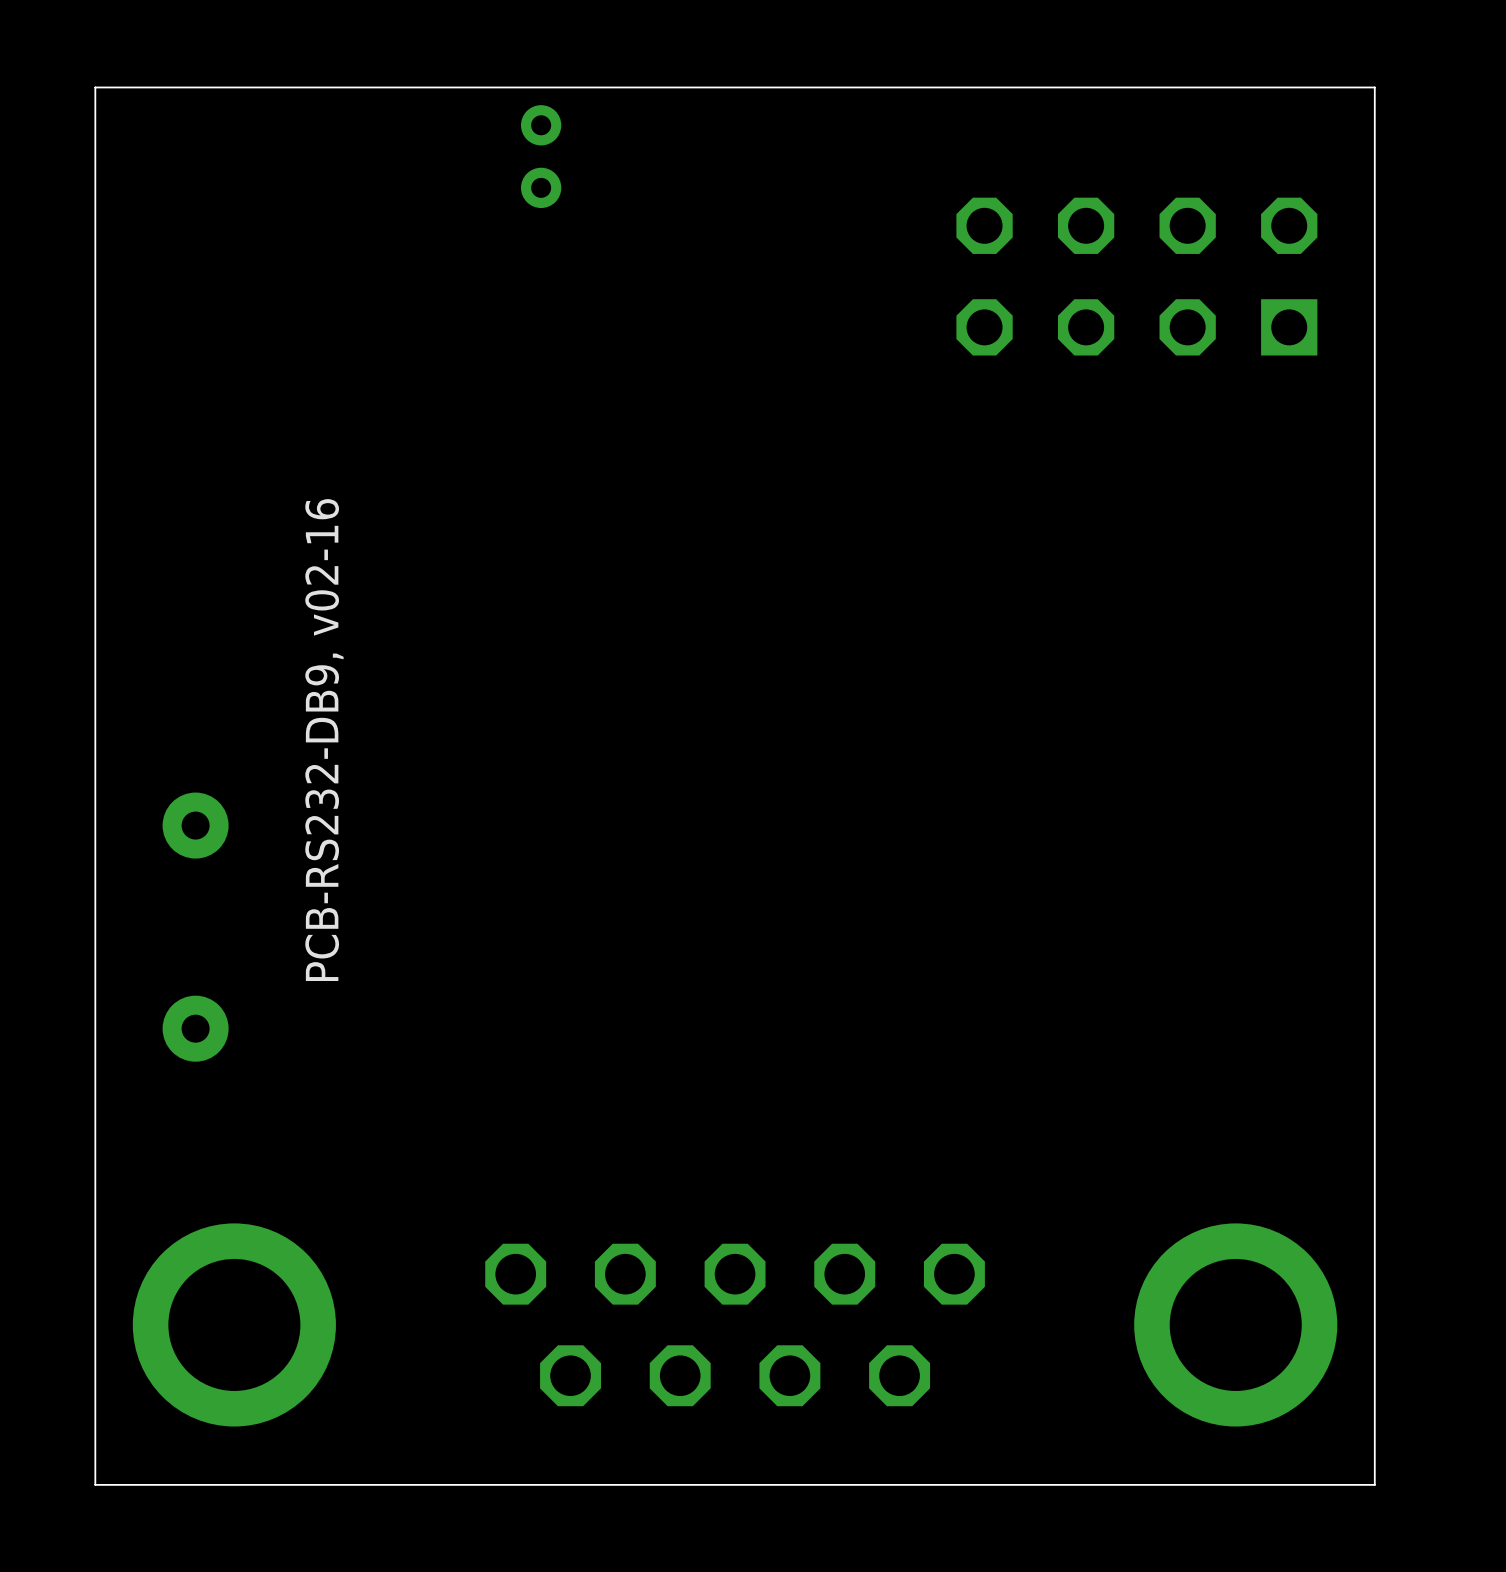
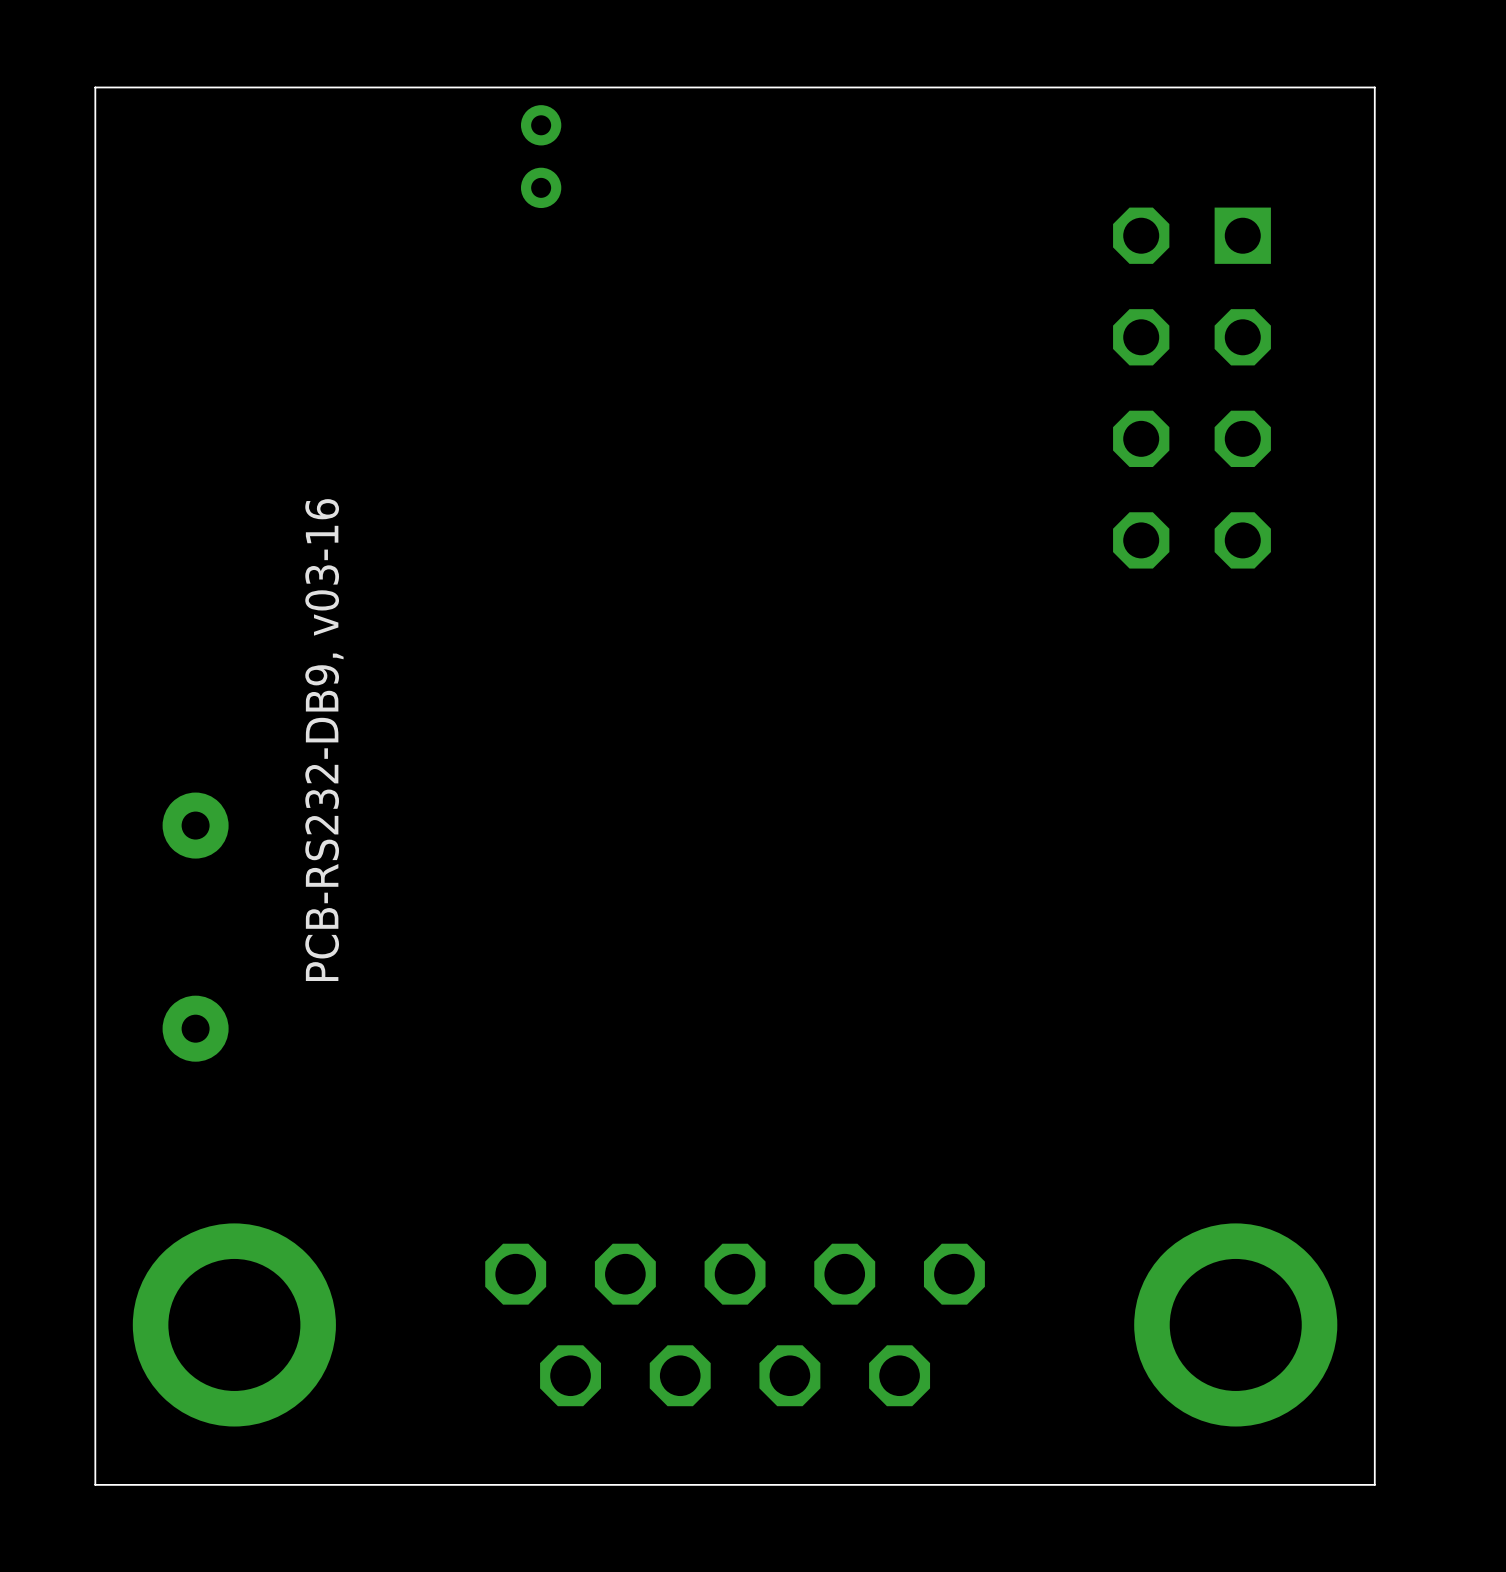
part rotation: 0° (1136, 276) -> 90° counterclockwise (1191, 388)
text: PCB-RS232-DB9, v02-16 (324, 740) -> PCB-RS232-DB9, v03-16 (324, 740)

